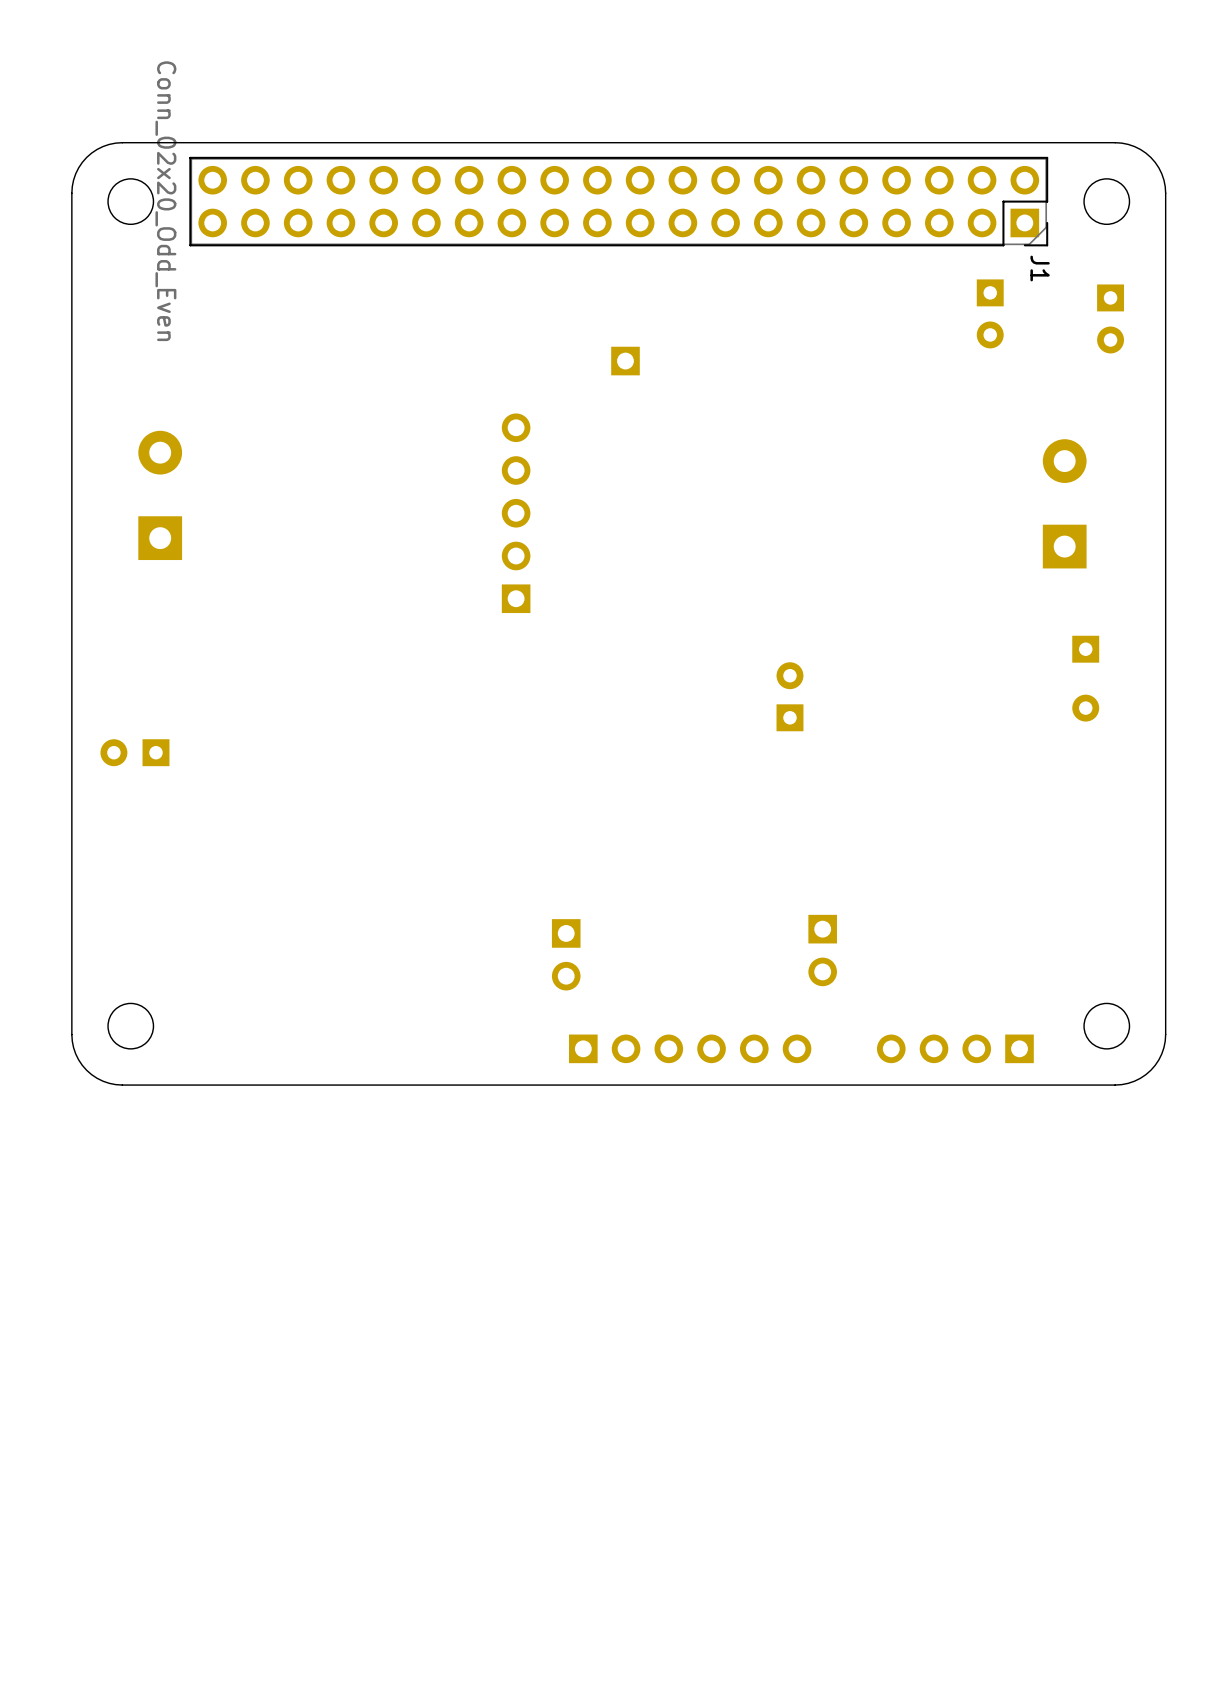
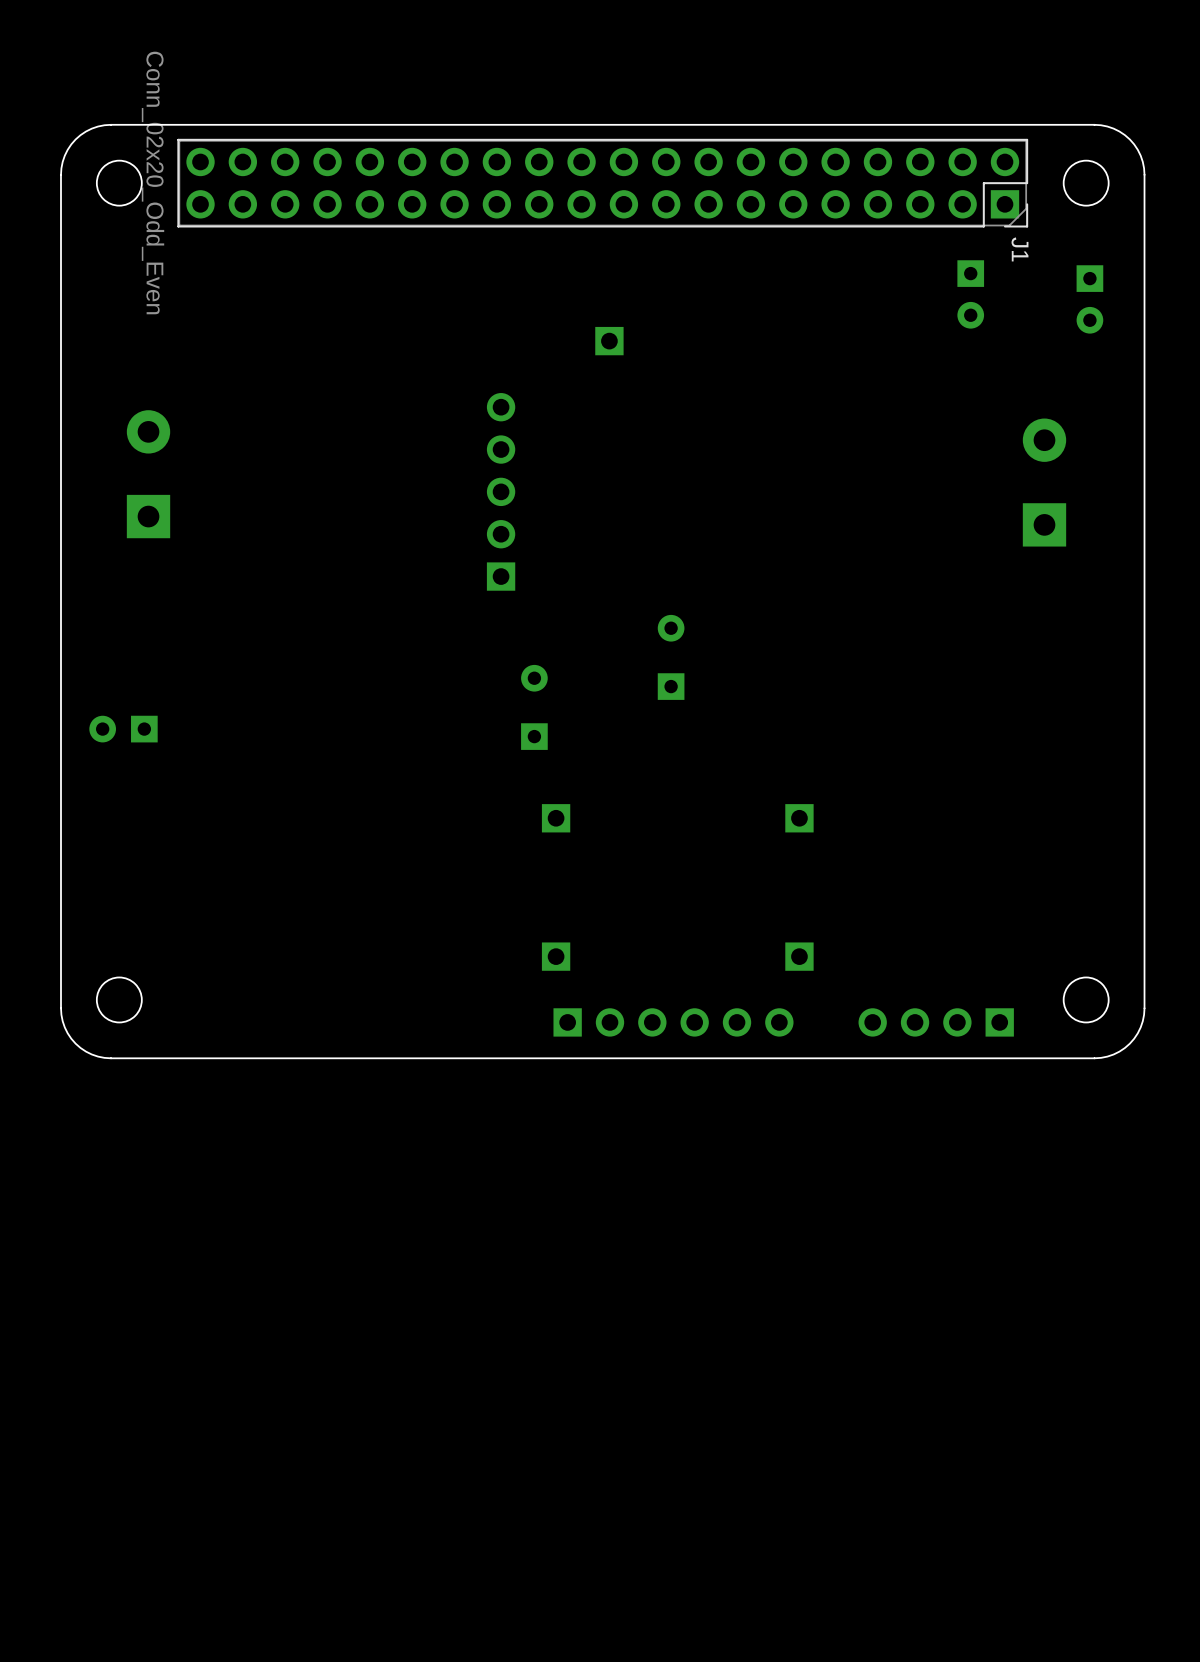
part: (1085, 678) -> none
part: none -> (671, 657)
part: (789, 696) -> none
part: none -> (534, 707)
part: none -> (556, 818)
part: none -> (799, 818)
part: (822, 950) -> none
part: (566, 954) -> none
part: none -> (556, 956)
part: none -> (799, 956)

